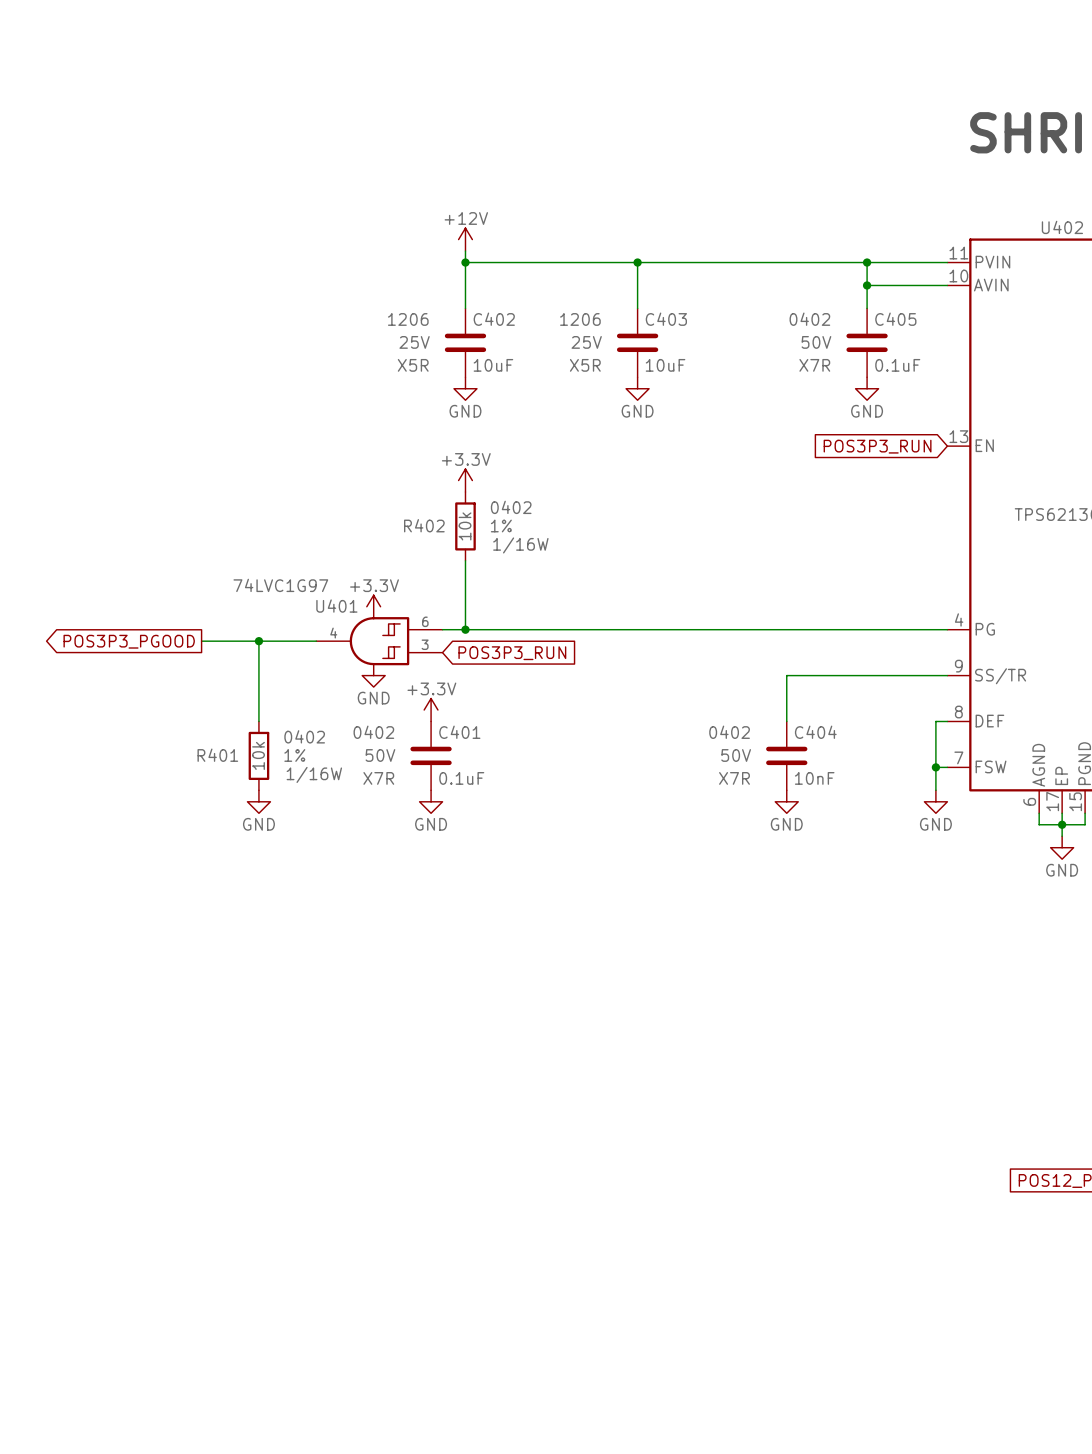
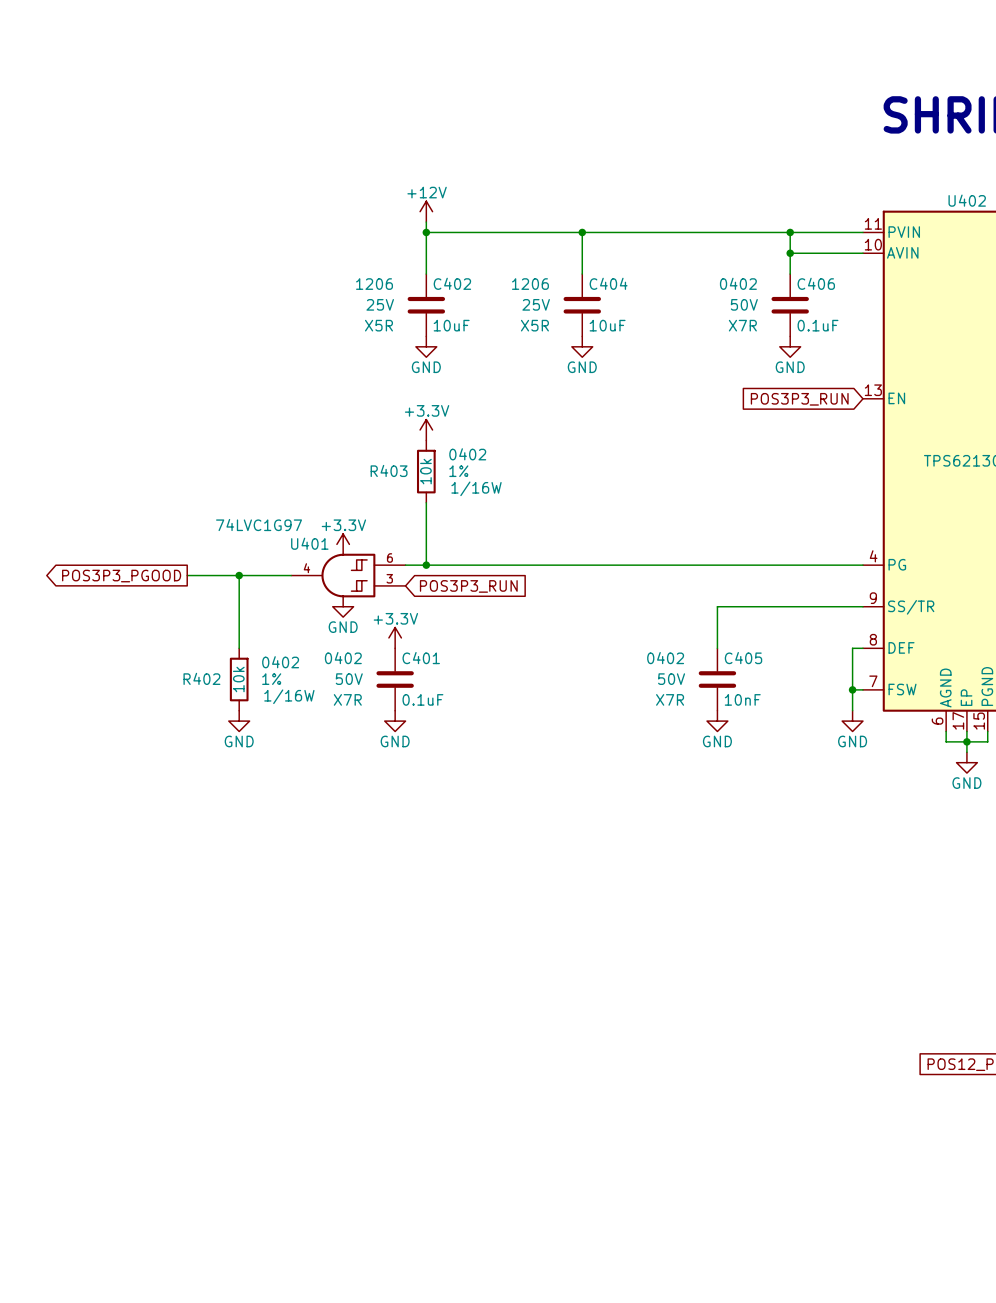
C403 name: C403 (666, 319) -> C404 (608, 283)
C405 name: C405 (895, 319) -> C406 (816, 283)
R402 name: R402 (424, 525) -> R403 (389, 470)
C404 name: C404 (815, 732) -> C405 (743, 658)
R401 name: R401 (217, 755) -> R402 (201, 678)

